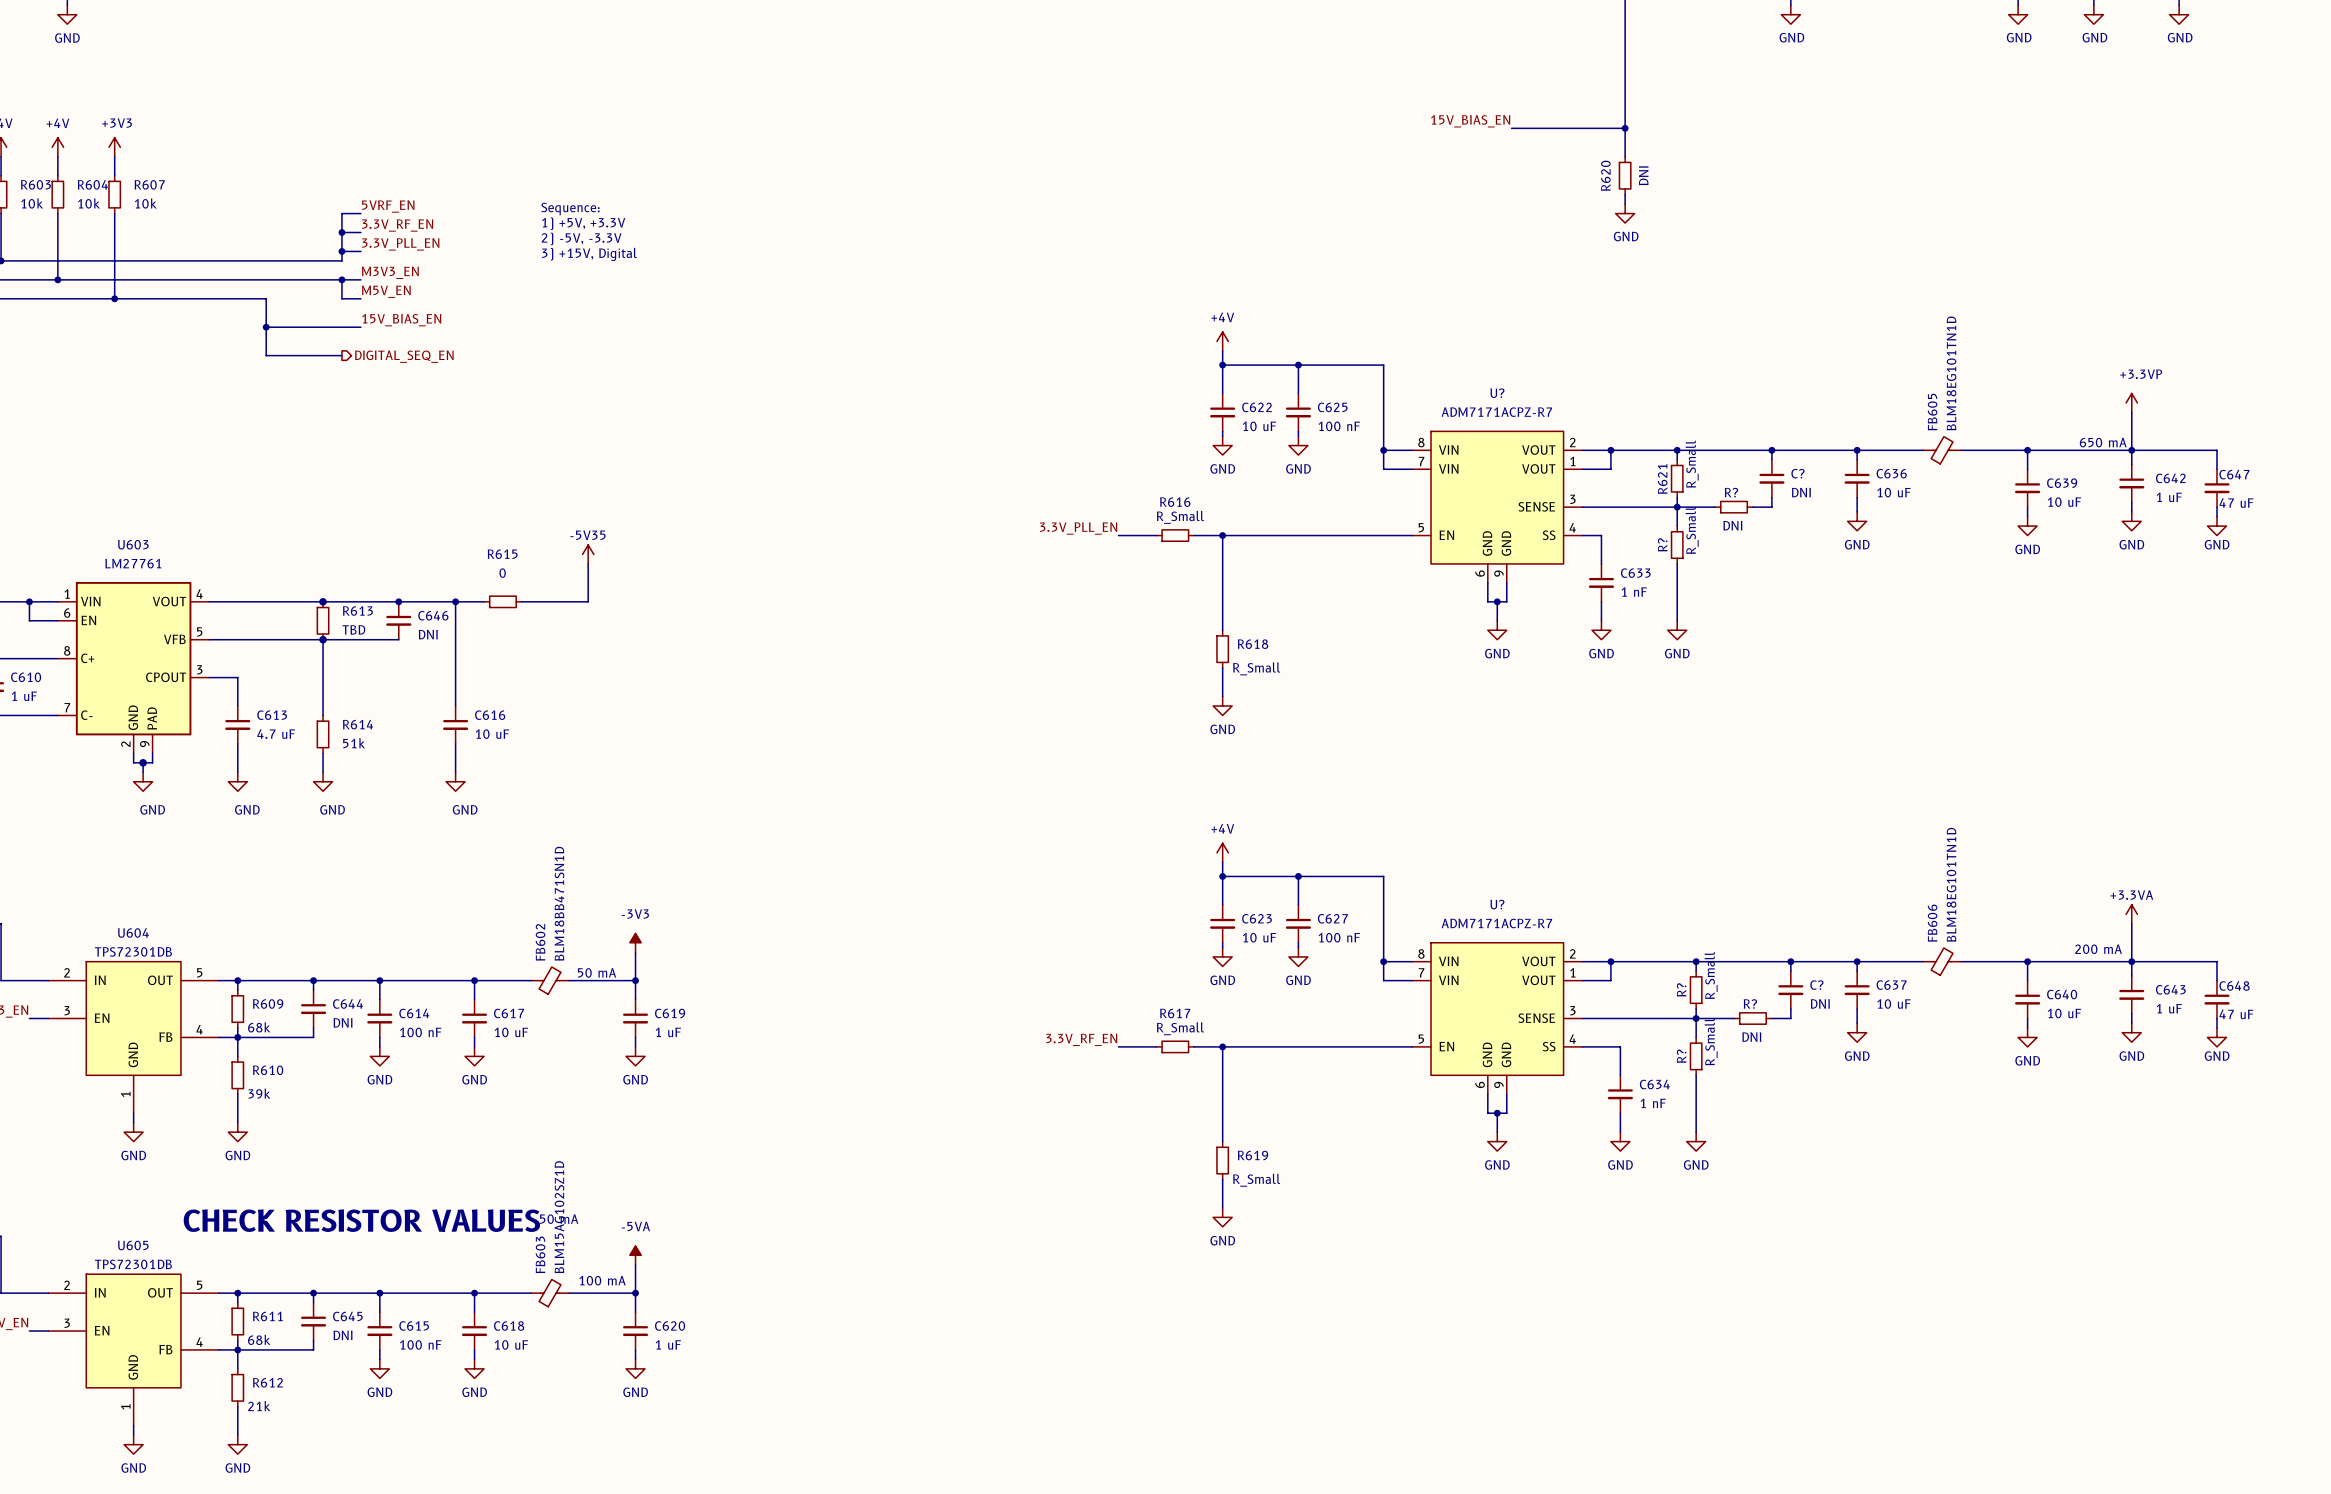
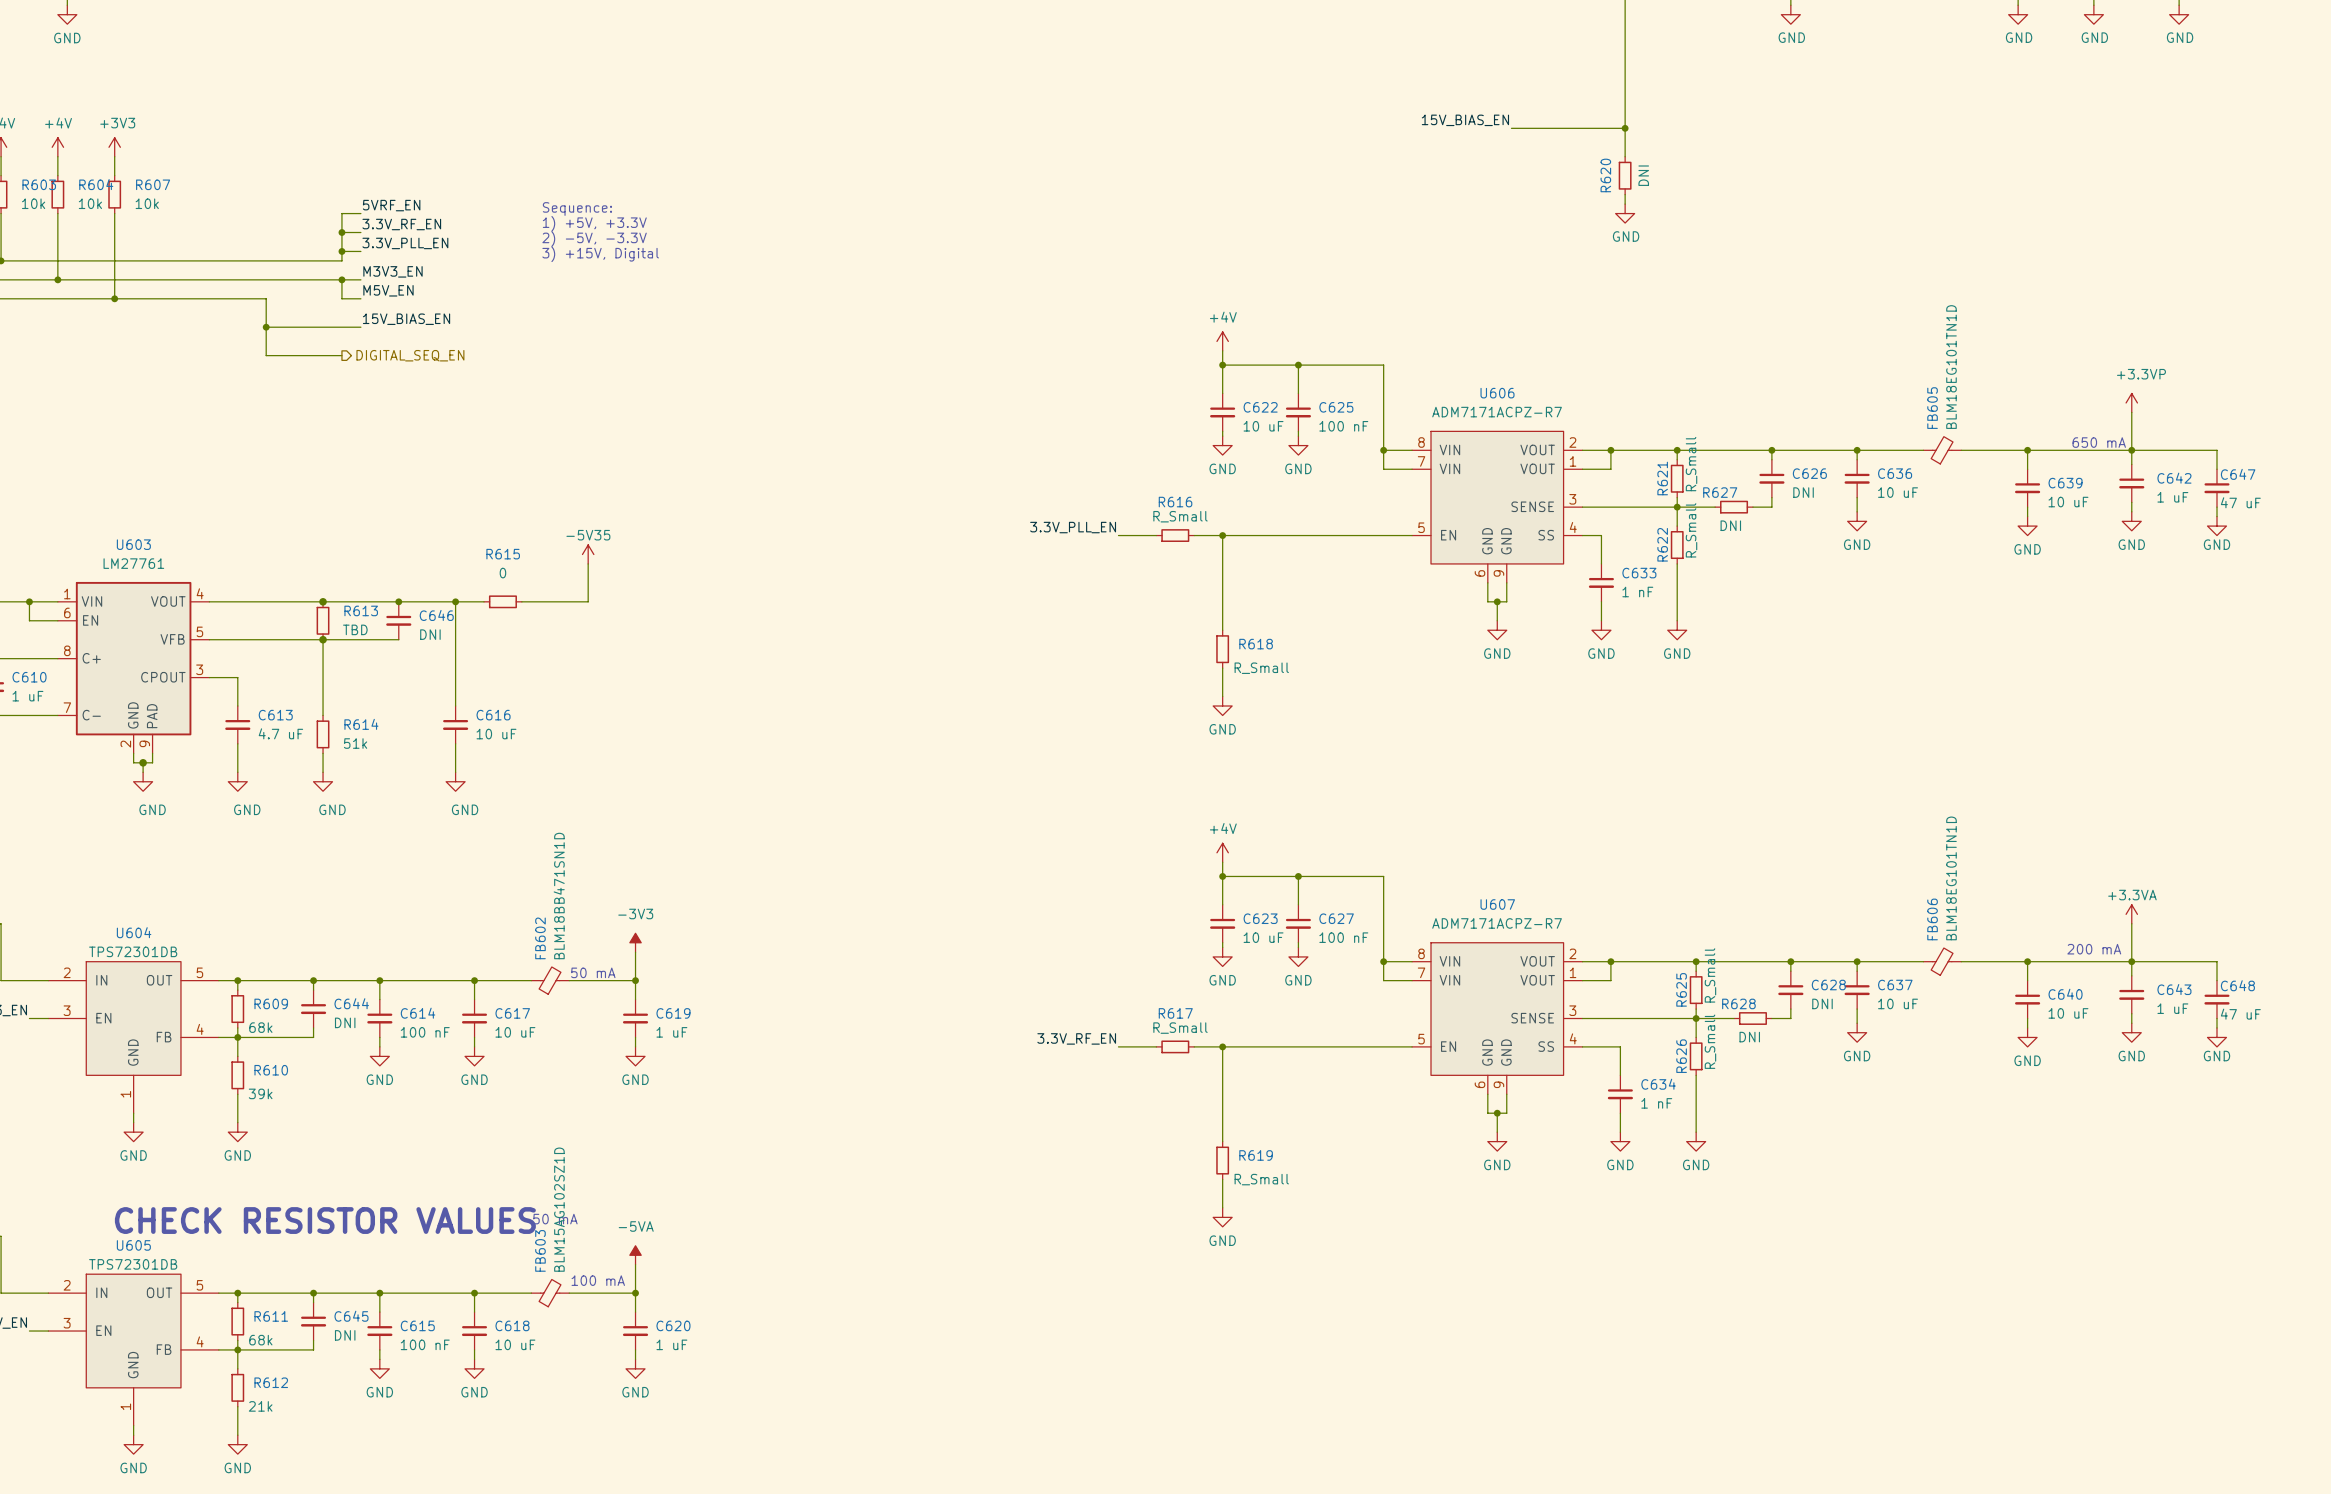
U? name: U? (1497, 393) -> U606 (1497, 393)
C? name: C? (1797, 473) -> C626 (1809, 473)
R? name: R? (1731, 492) -> R627 (1720, 492)
R? name: R? (1662, 544) -> R622 (1662, 544)
U? name: U? (1497, 904) -> U607 (1497, 904)
C? name: C? (1816, 985) -> C628 (1828, 985)
R? name: R? (1681, 989) -> R625 (1681, 989)
R? name: R? (1750, 1004) -> R628 (1738, 1003)
R? name: R? (1681, 1056) -> R626 (1681, 1056)

